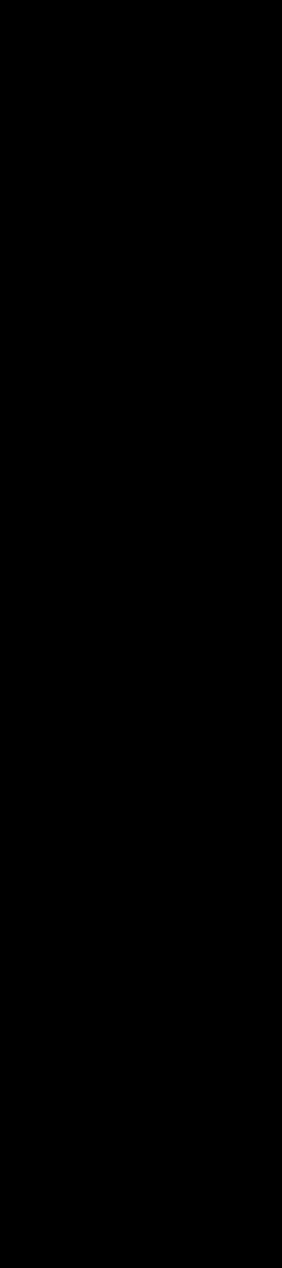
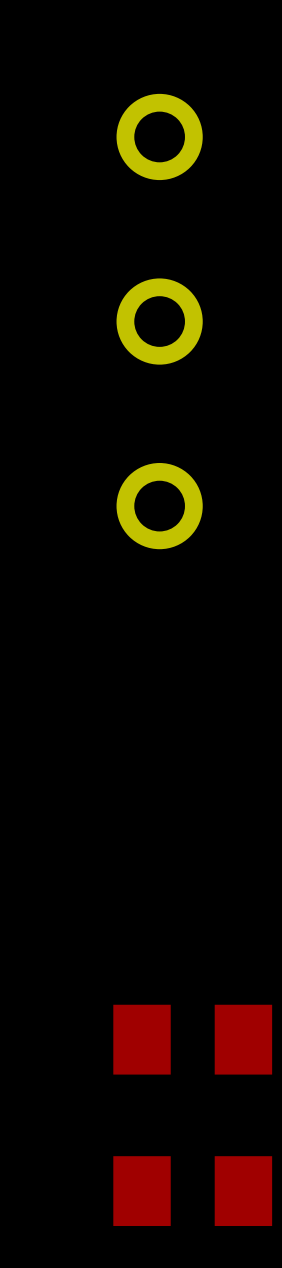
part: none -> (159, 136)
part: none -> (159, 321)
part: none -> (159, 506)
part: none -> (192, 1039)
part: none -> (192, 1191)

